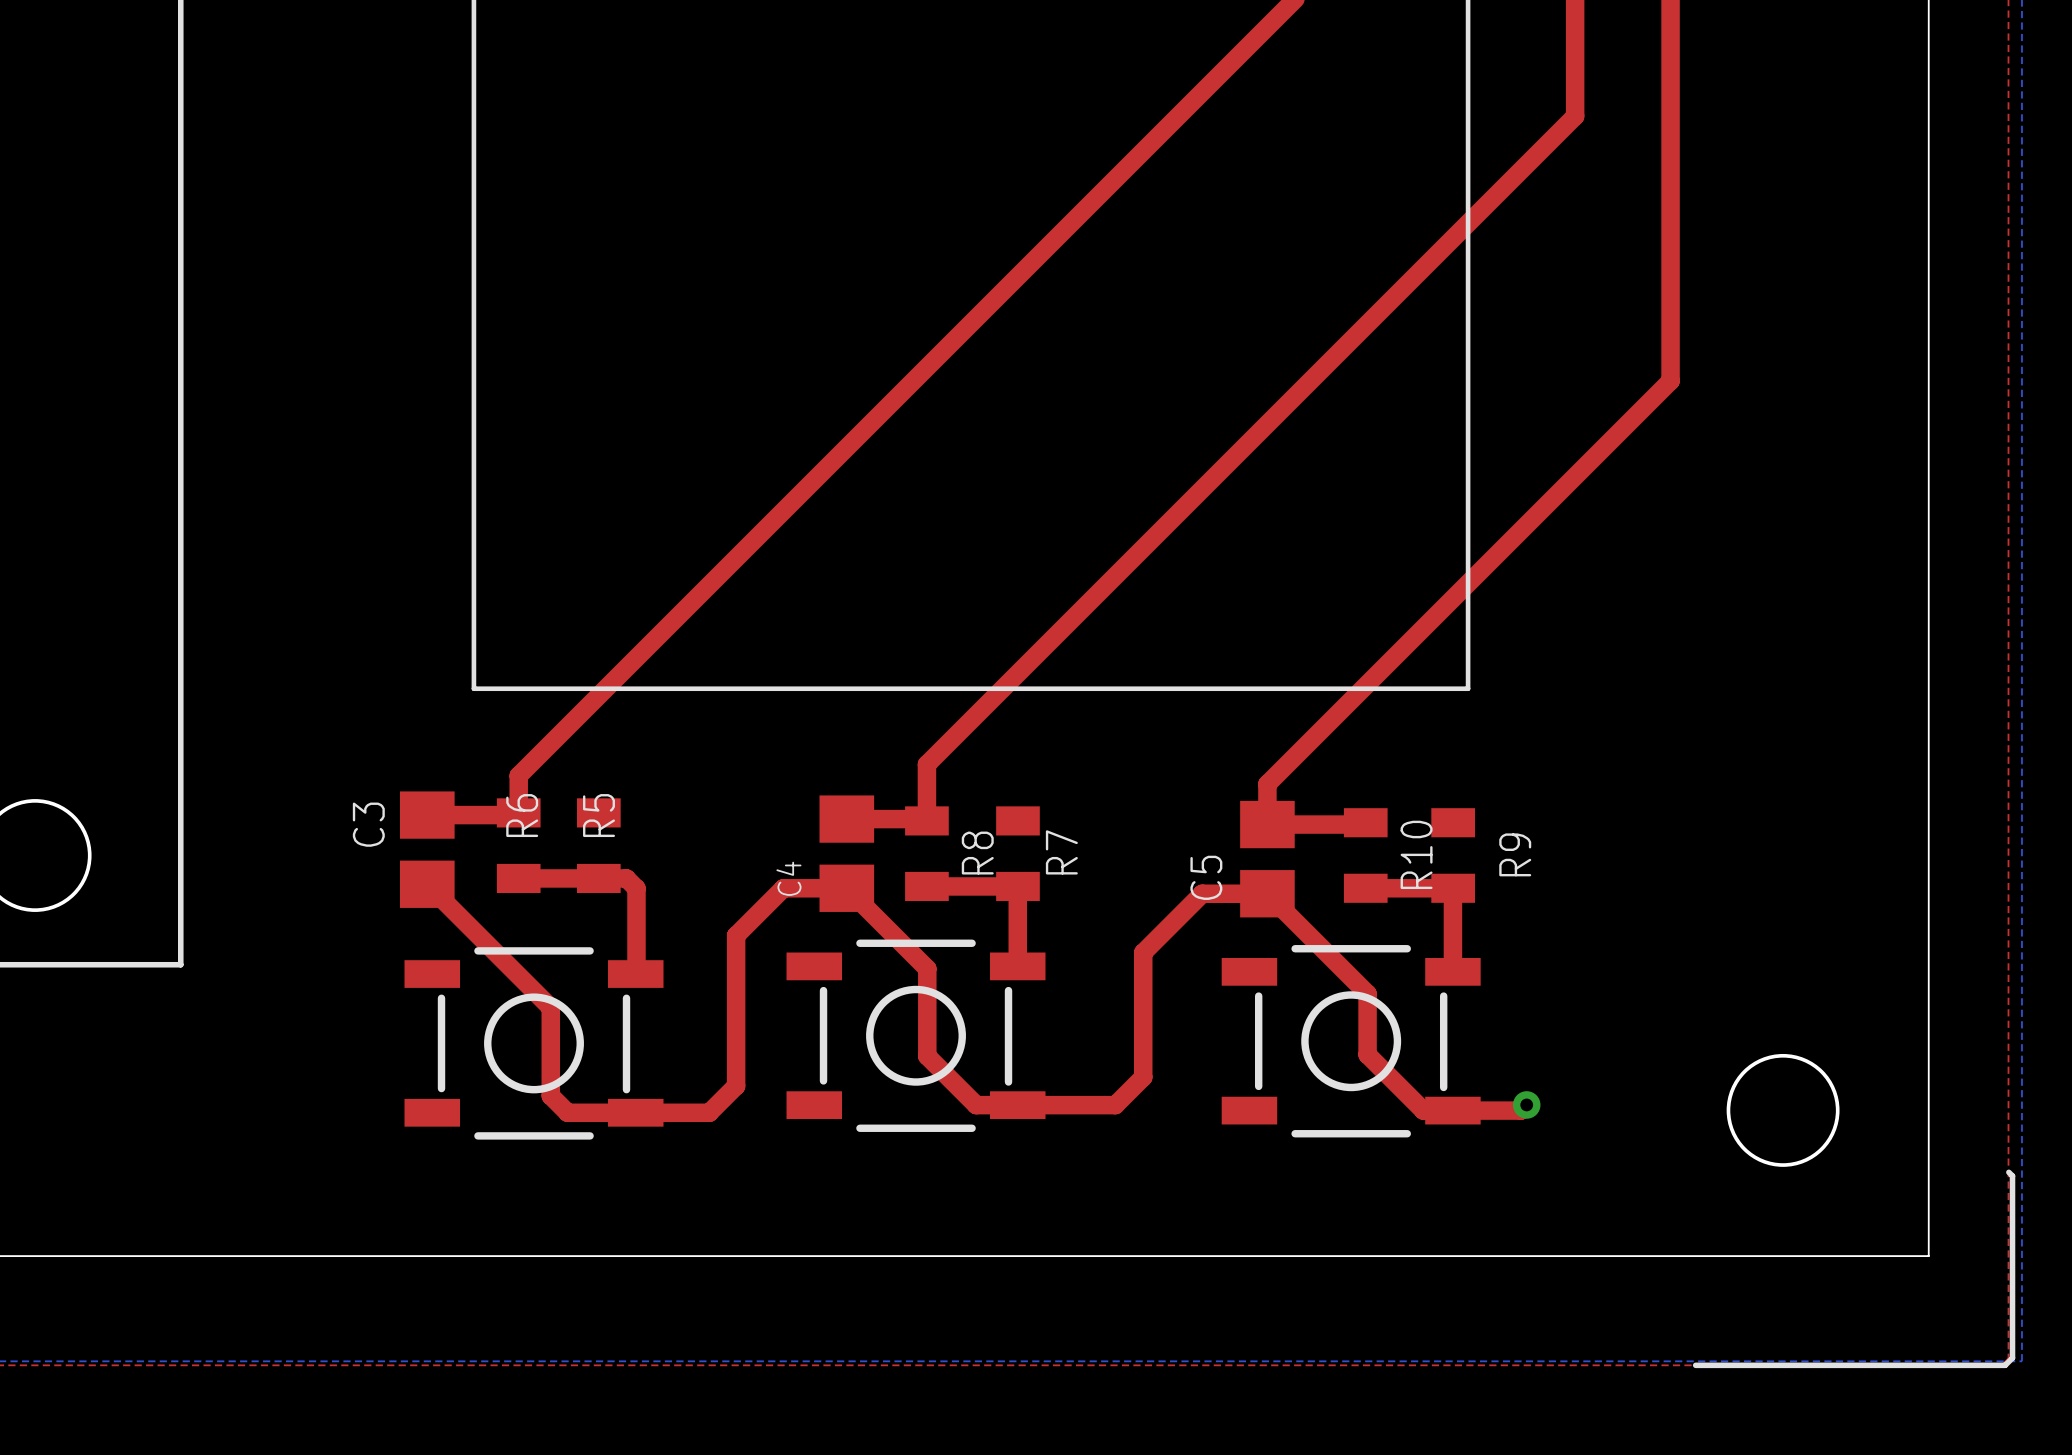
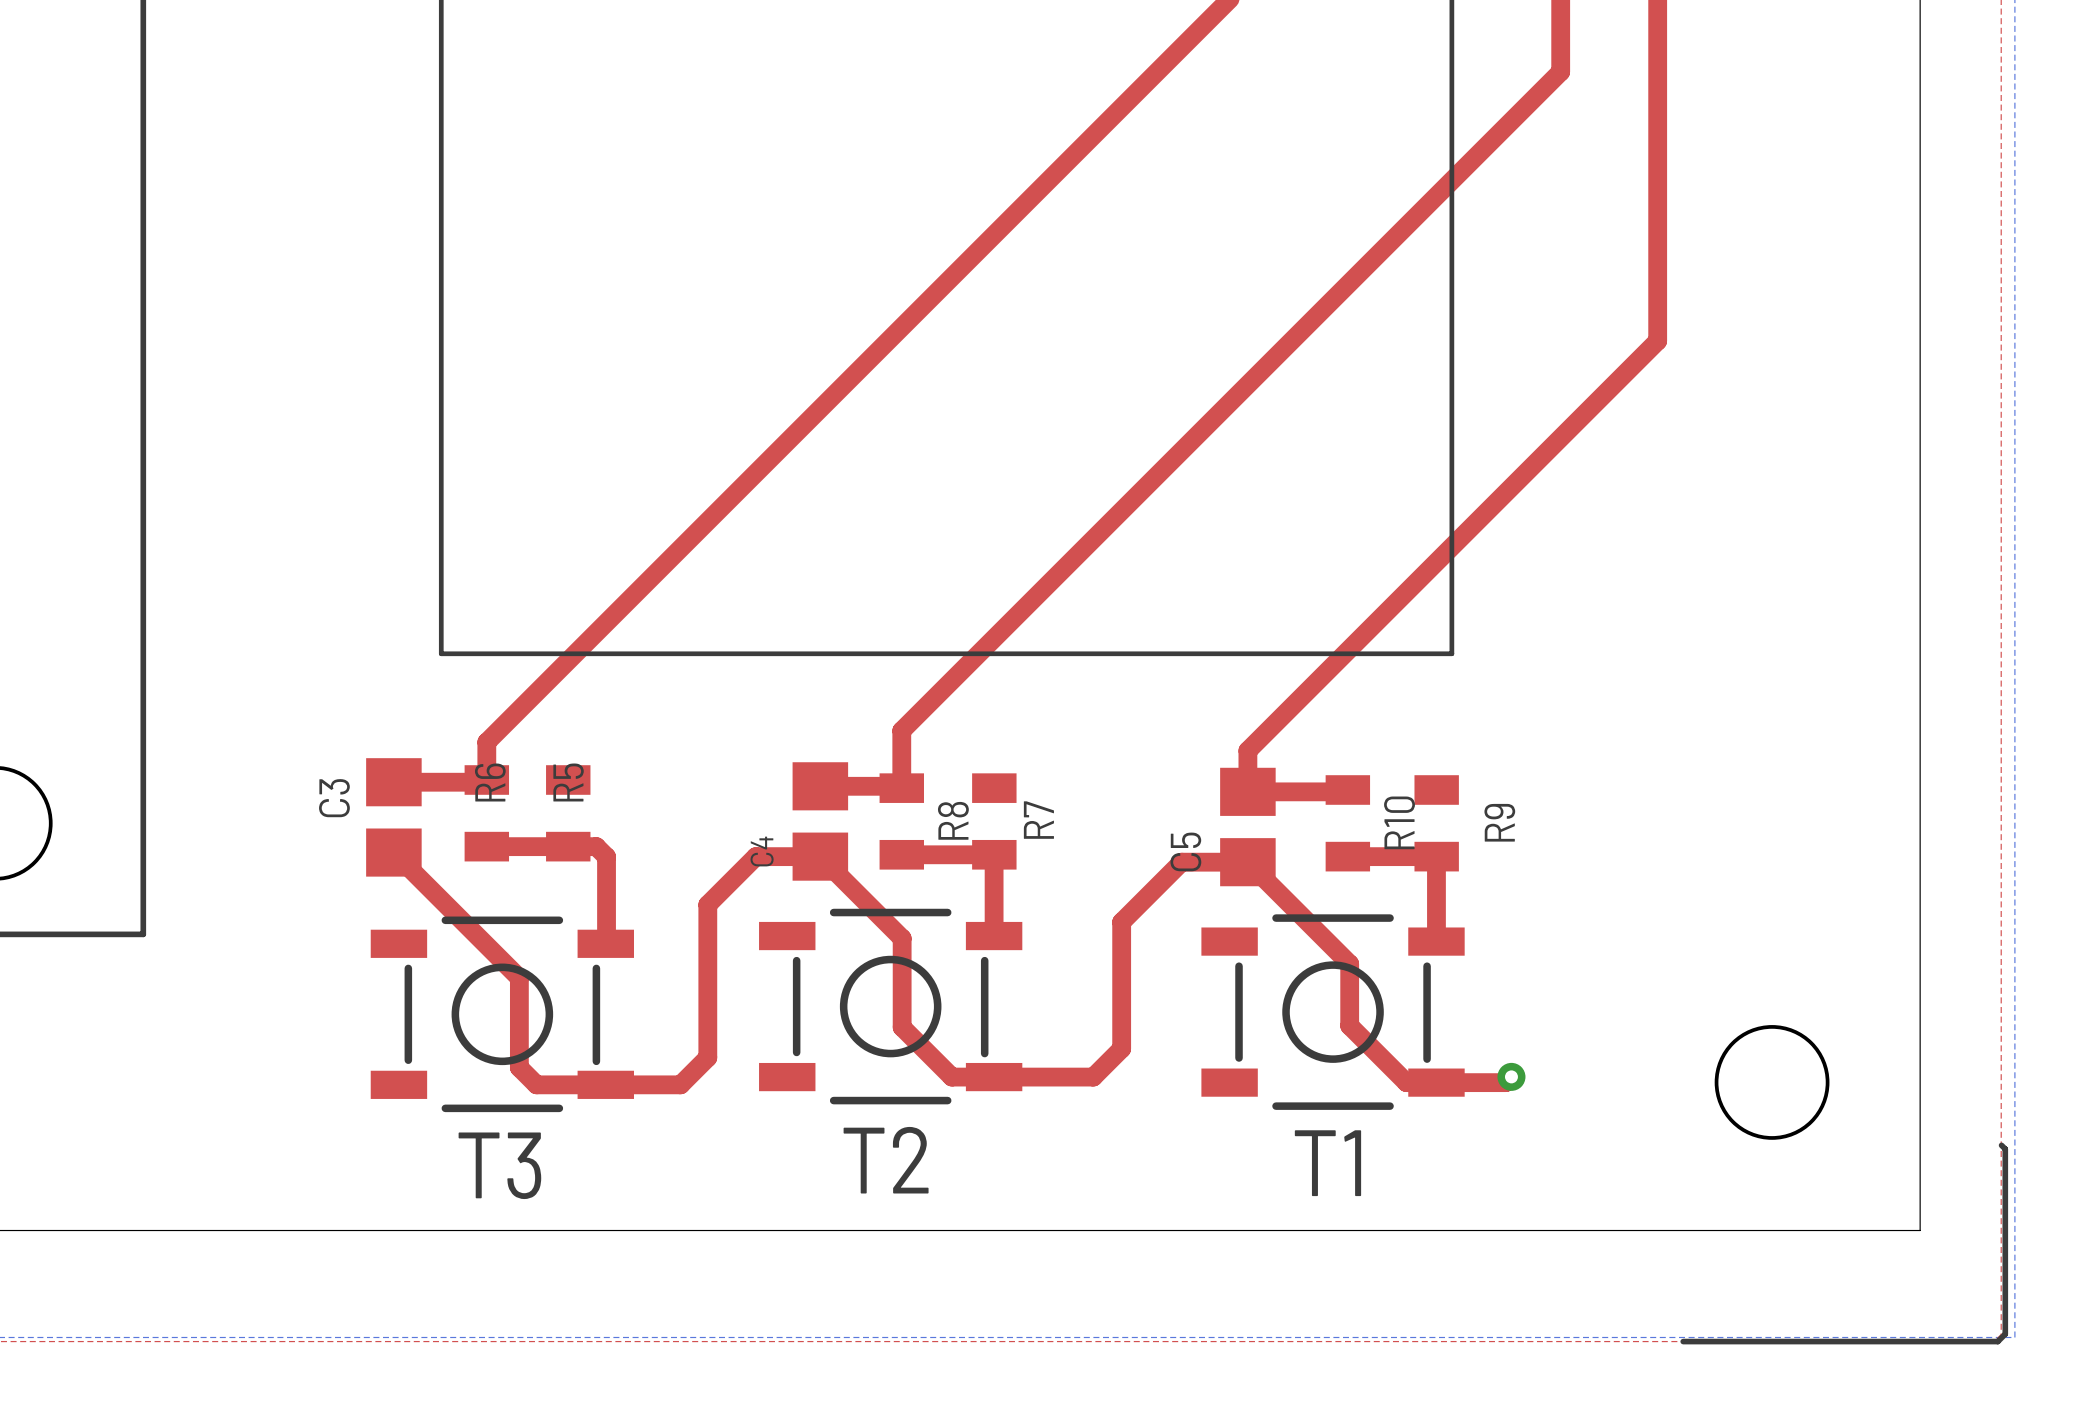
text: none -> T2 (886, 1160)
text: none -> T1 (1327, 1163)
text: none -> T3 (499, 1165)

